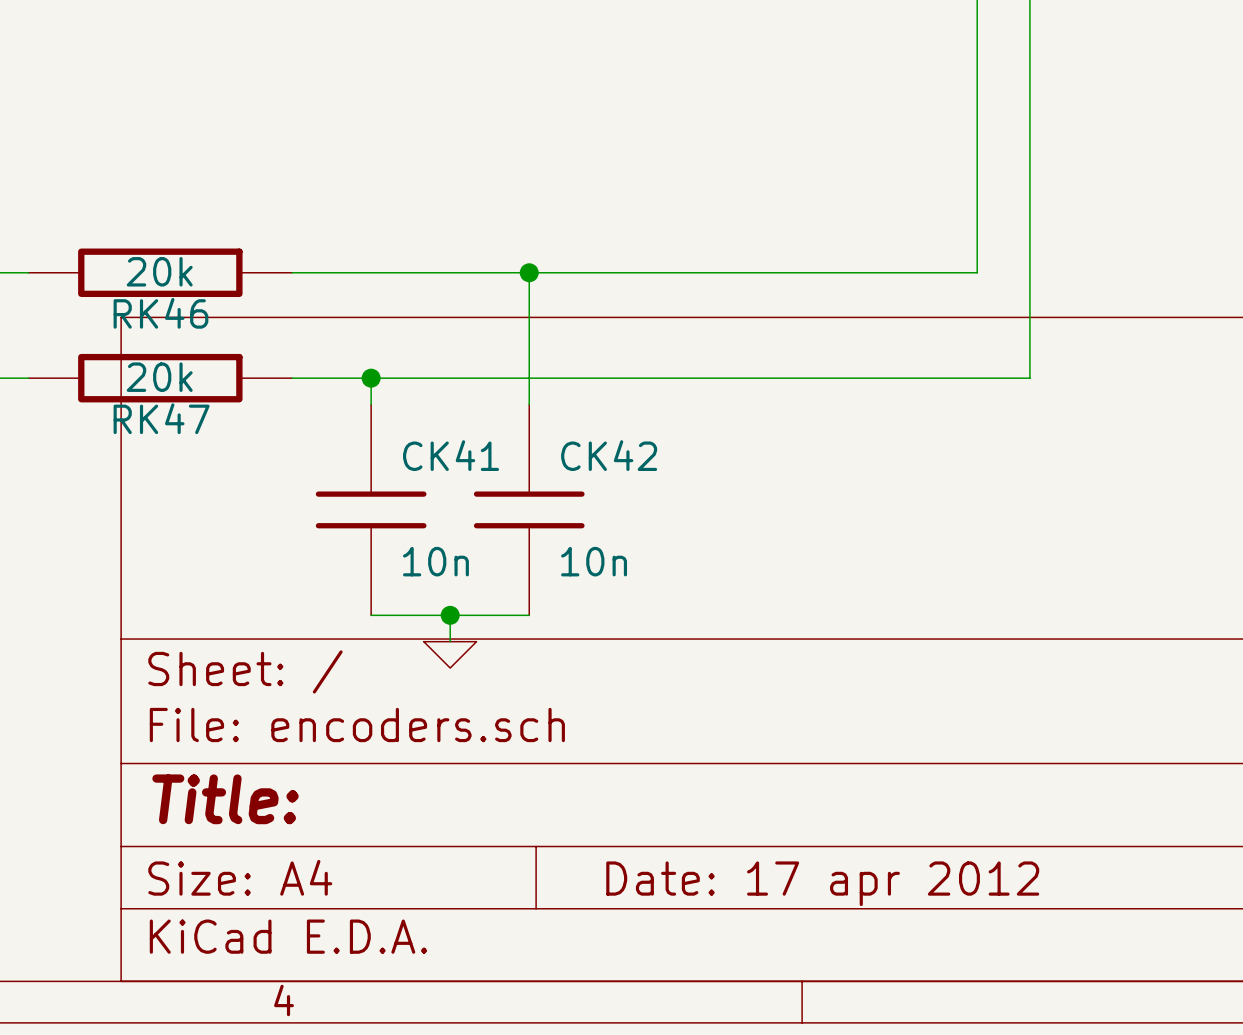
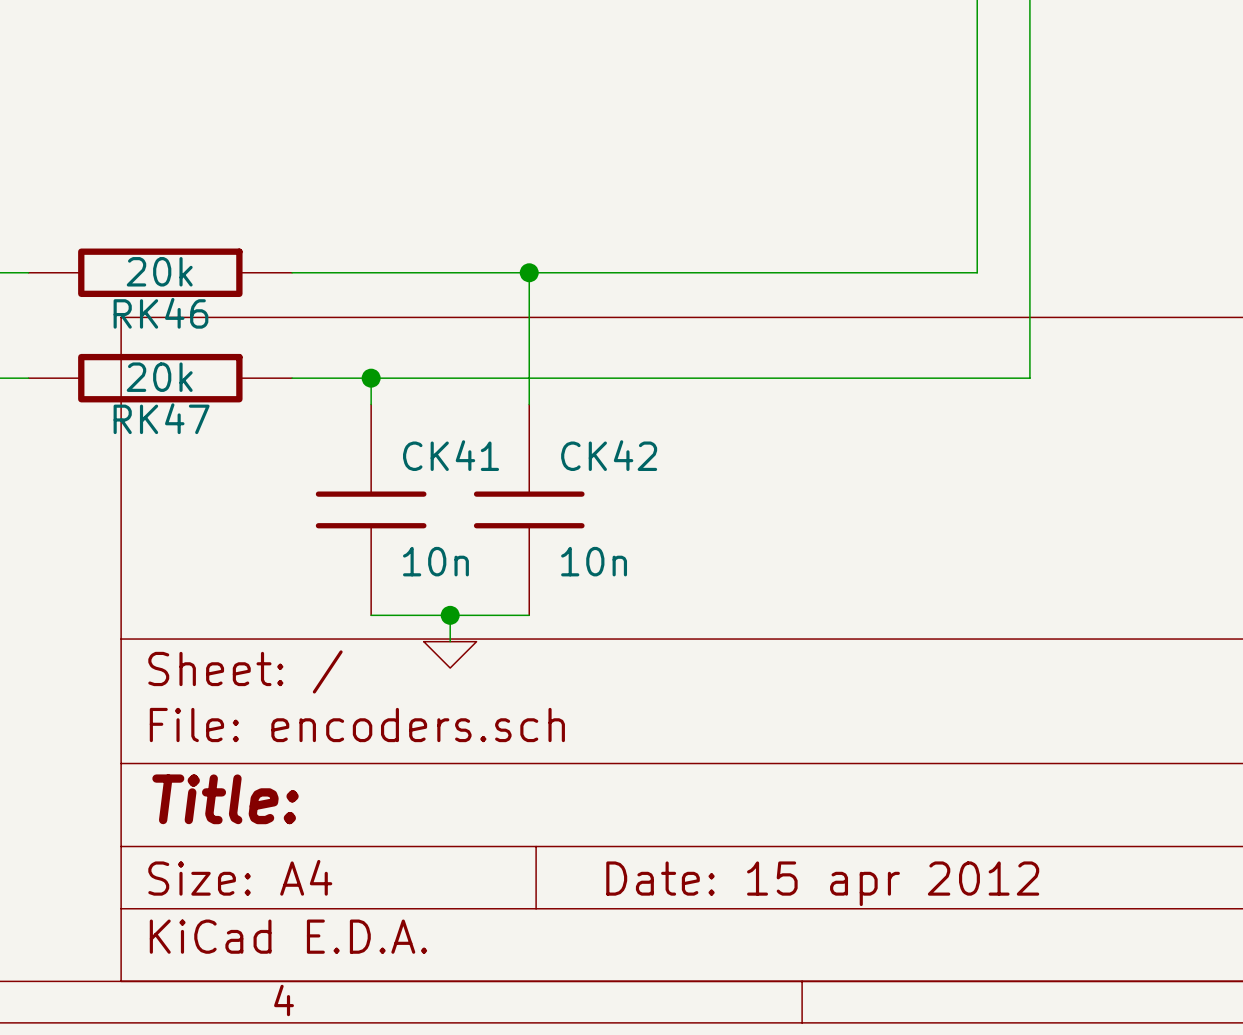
title block: Date: 17 apr 2012 (822, 883) -> Date: 15 apr 2012 (822, 883)

